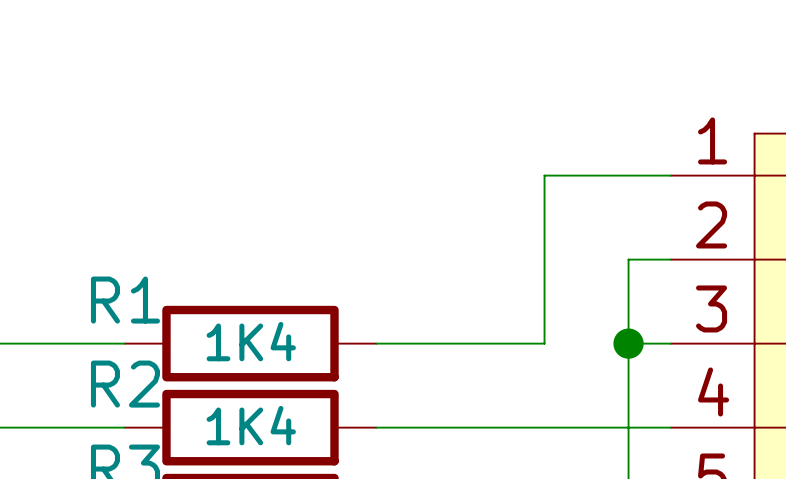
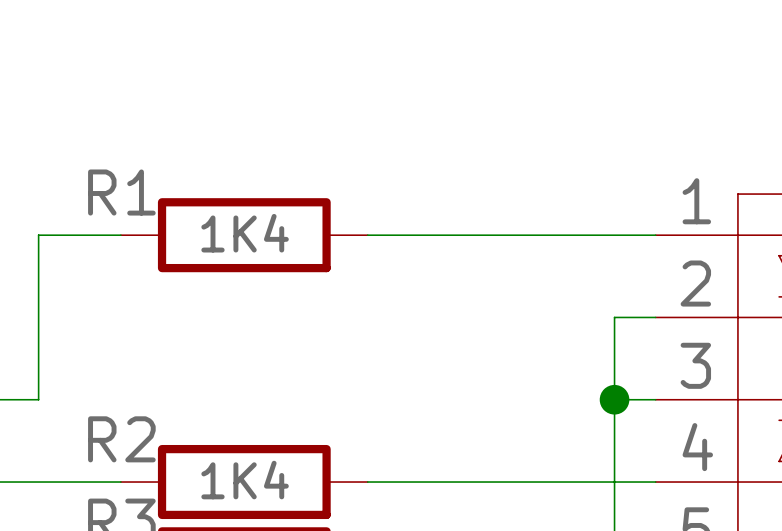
wire: (544, 175) (544, 343) (376, 343) -> (532, 235) (367, 235)
wire: (40, 343) (124, 343) -> (38, 399) (38, 235) (120, 235)
R1 position: (250, 343) -> (244, 235)

